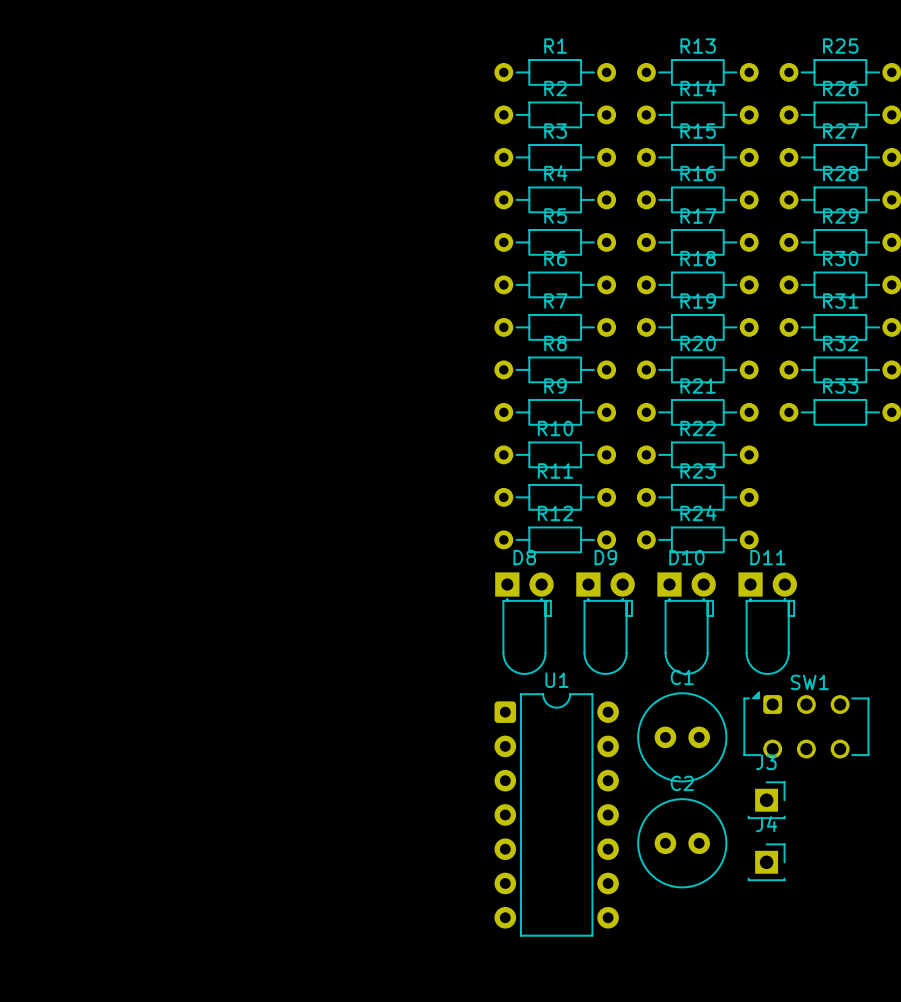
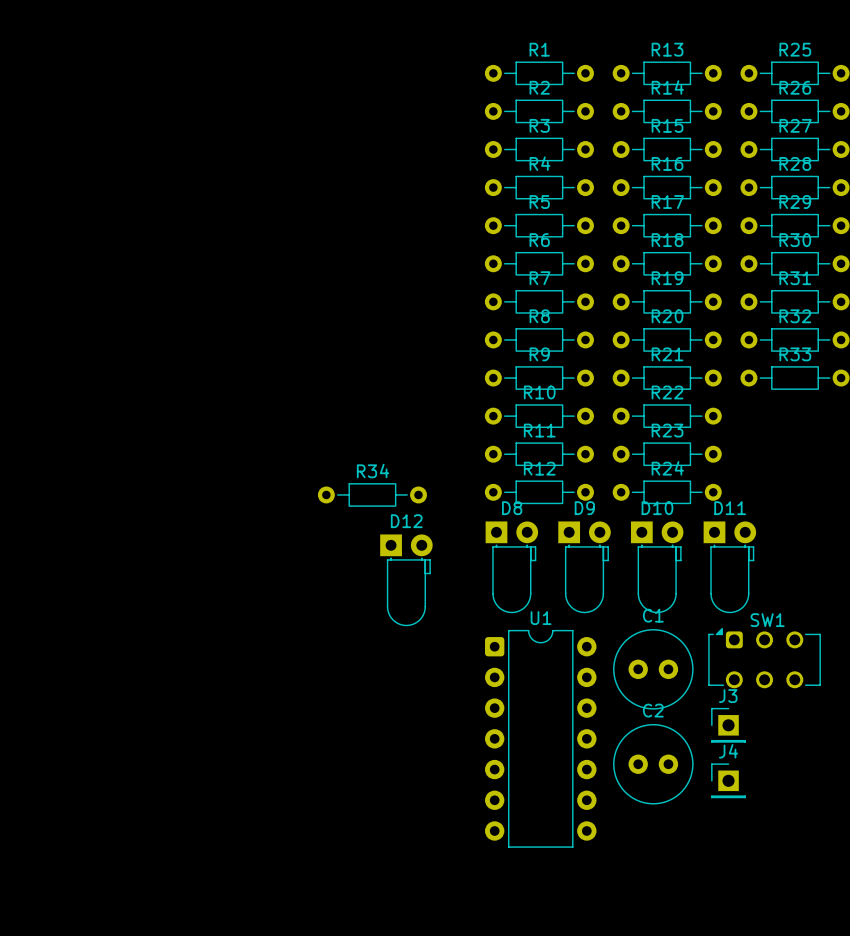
R34: none -> (372, 494)
D12: none -> (406, 580)
J3 footprint: [747, 781, 786, 819] -> [711, 707, 746, 743]
J4 footprint: [747, 843, 786, 882] -> [711, 763, 746, 799]

